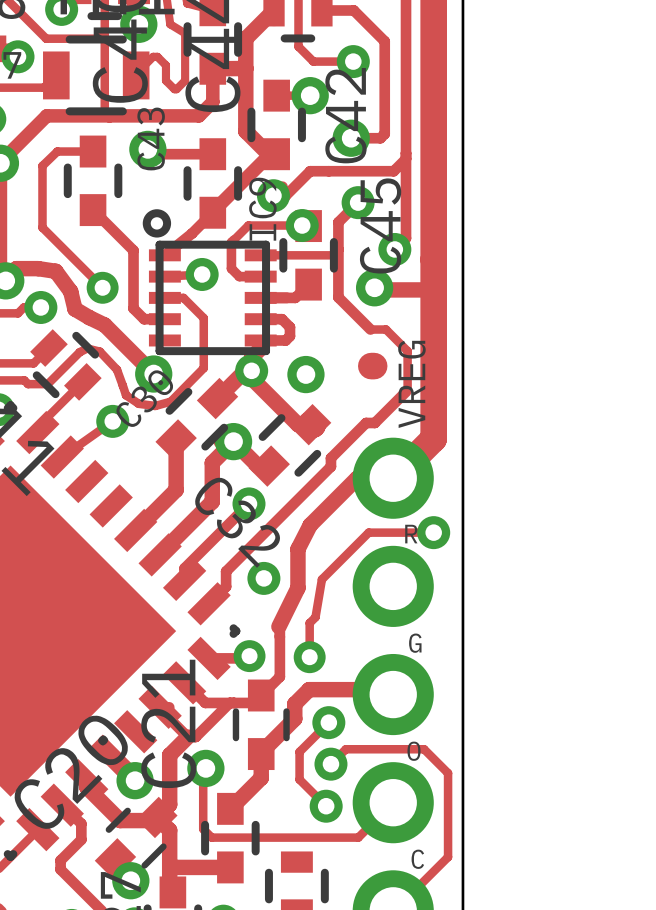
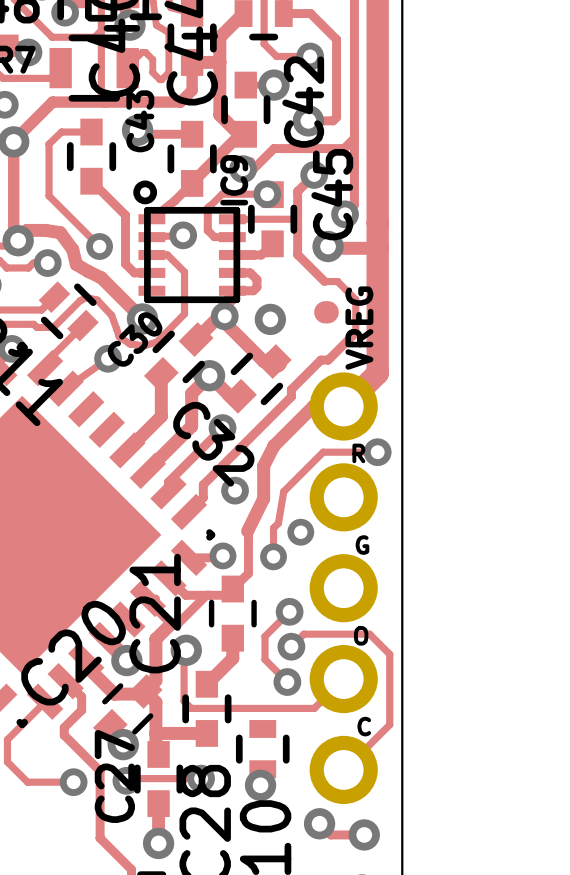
via: none -> (300, 532)
track: (393, 694) (388, 689) (309, 689) (294, 704) (294, 718) (261, 754) -> none

